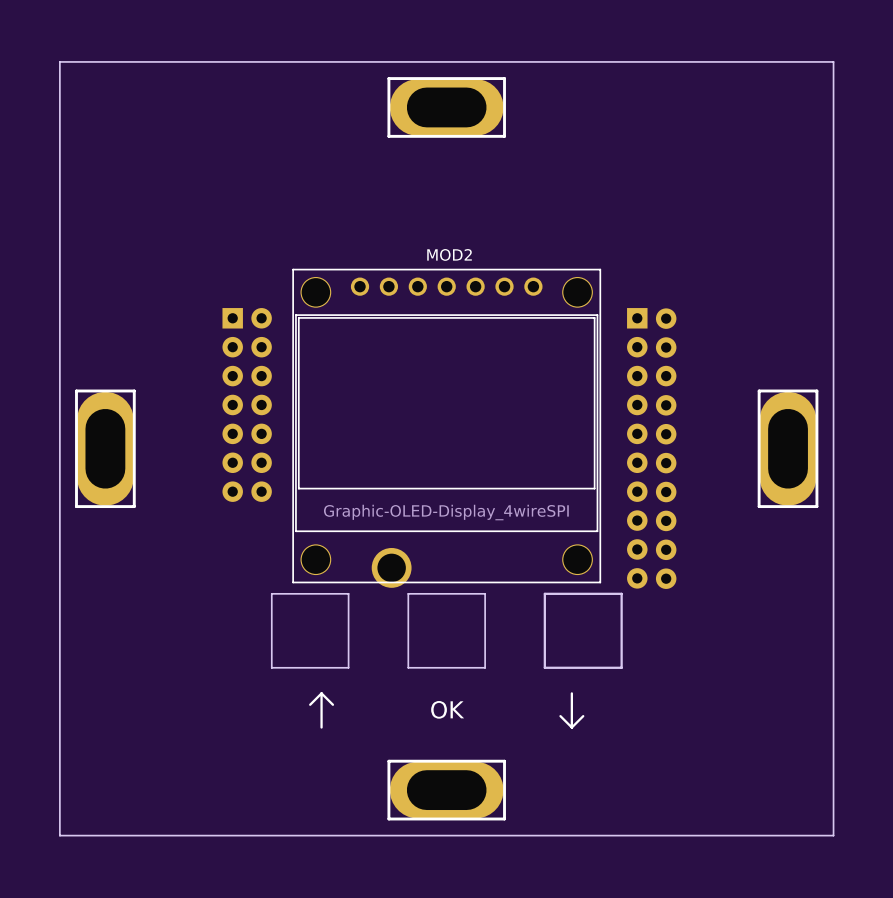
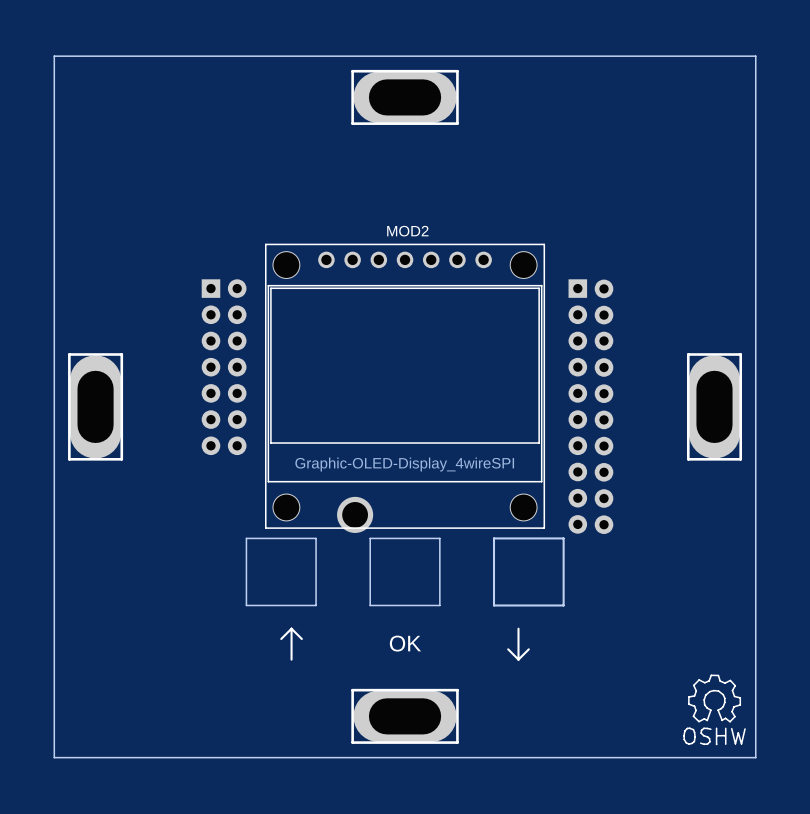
drawing: none -> [683, 674, 746, 746]

